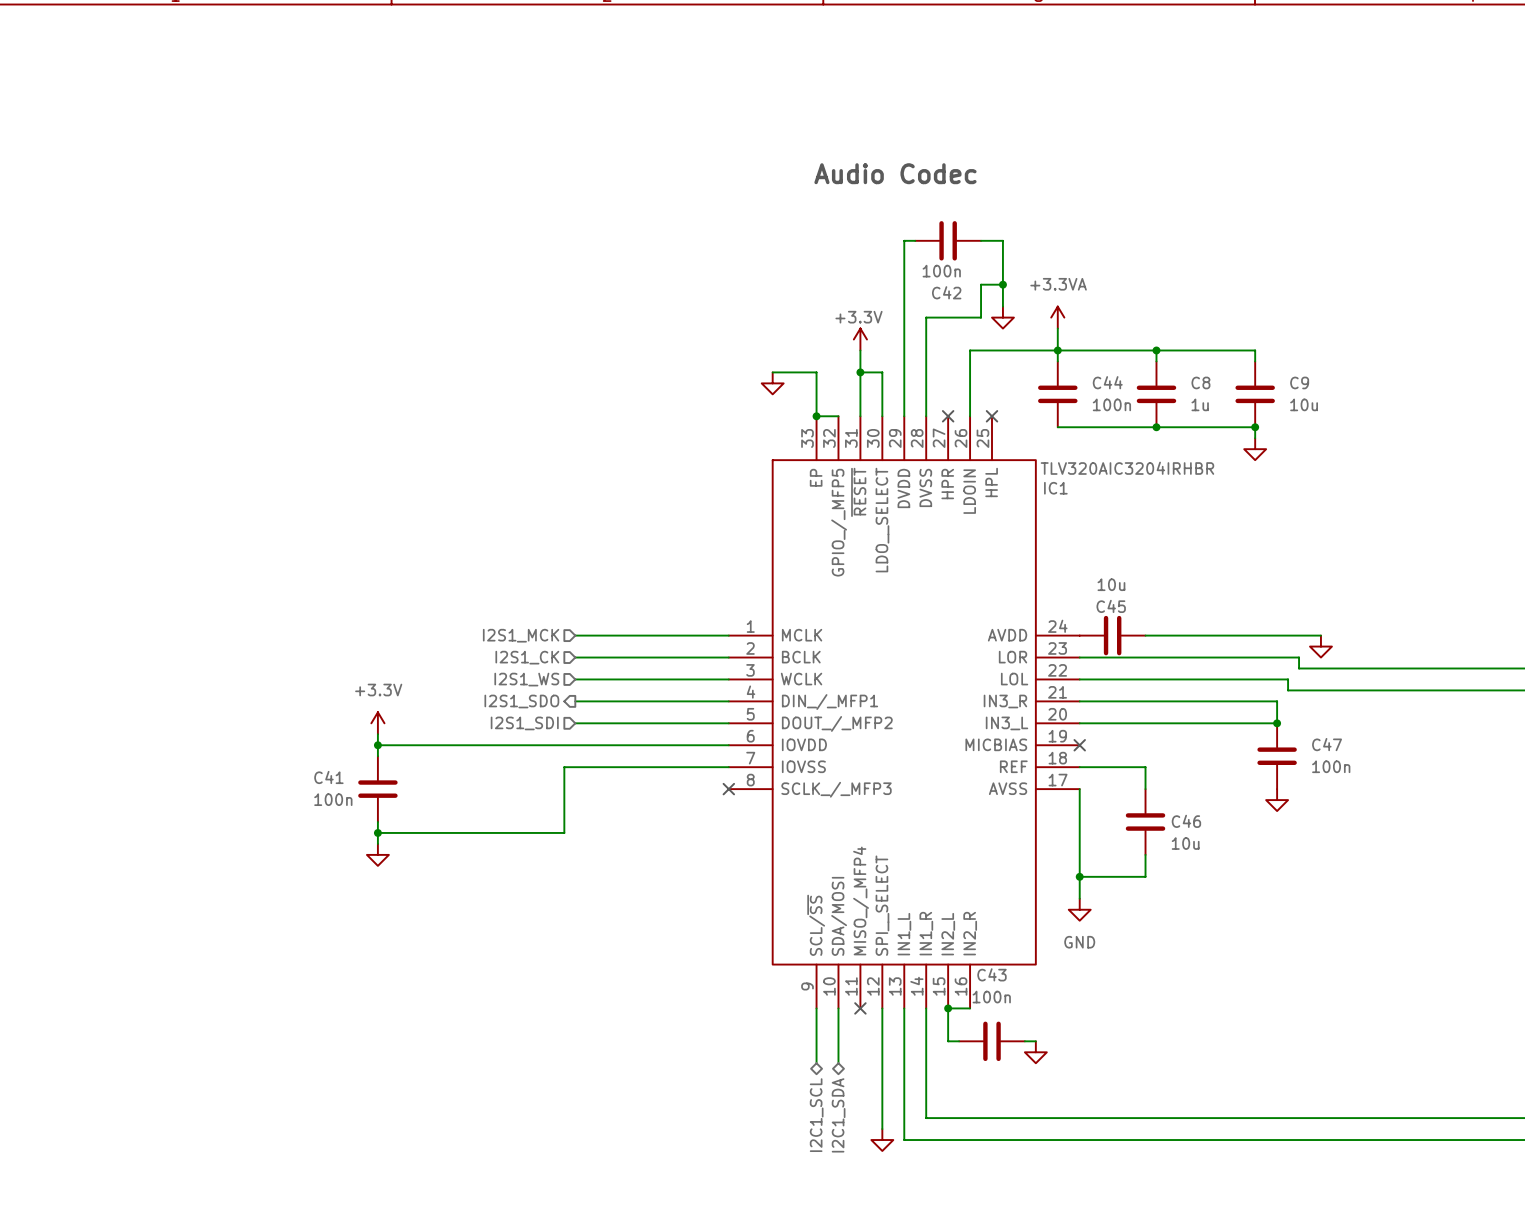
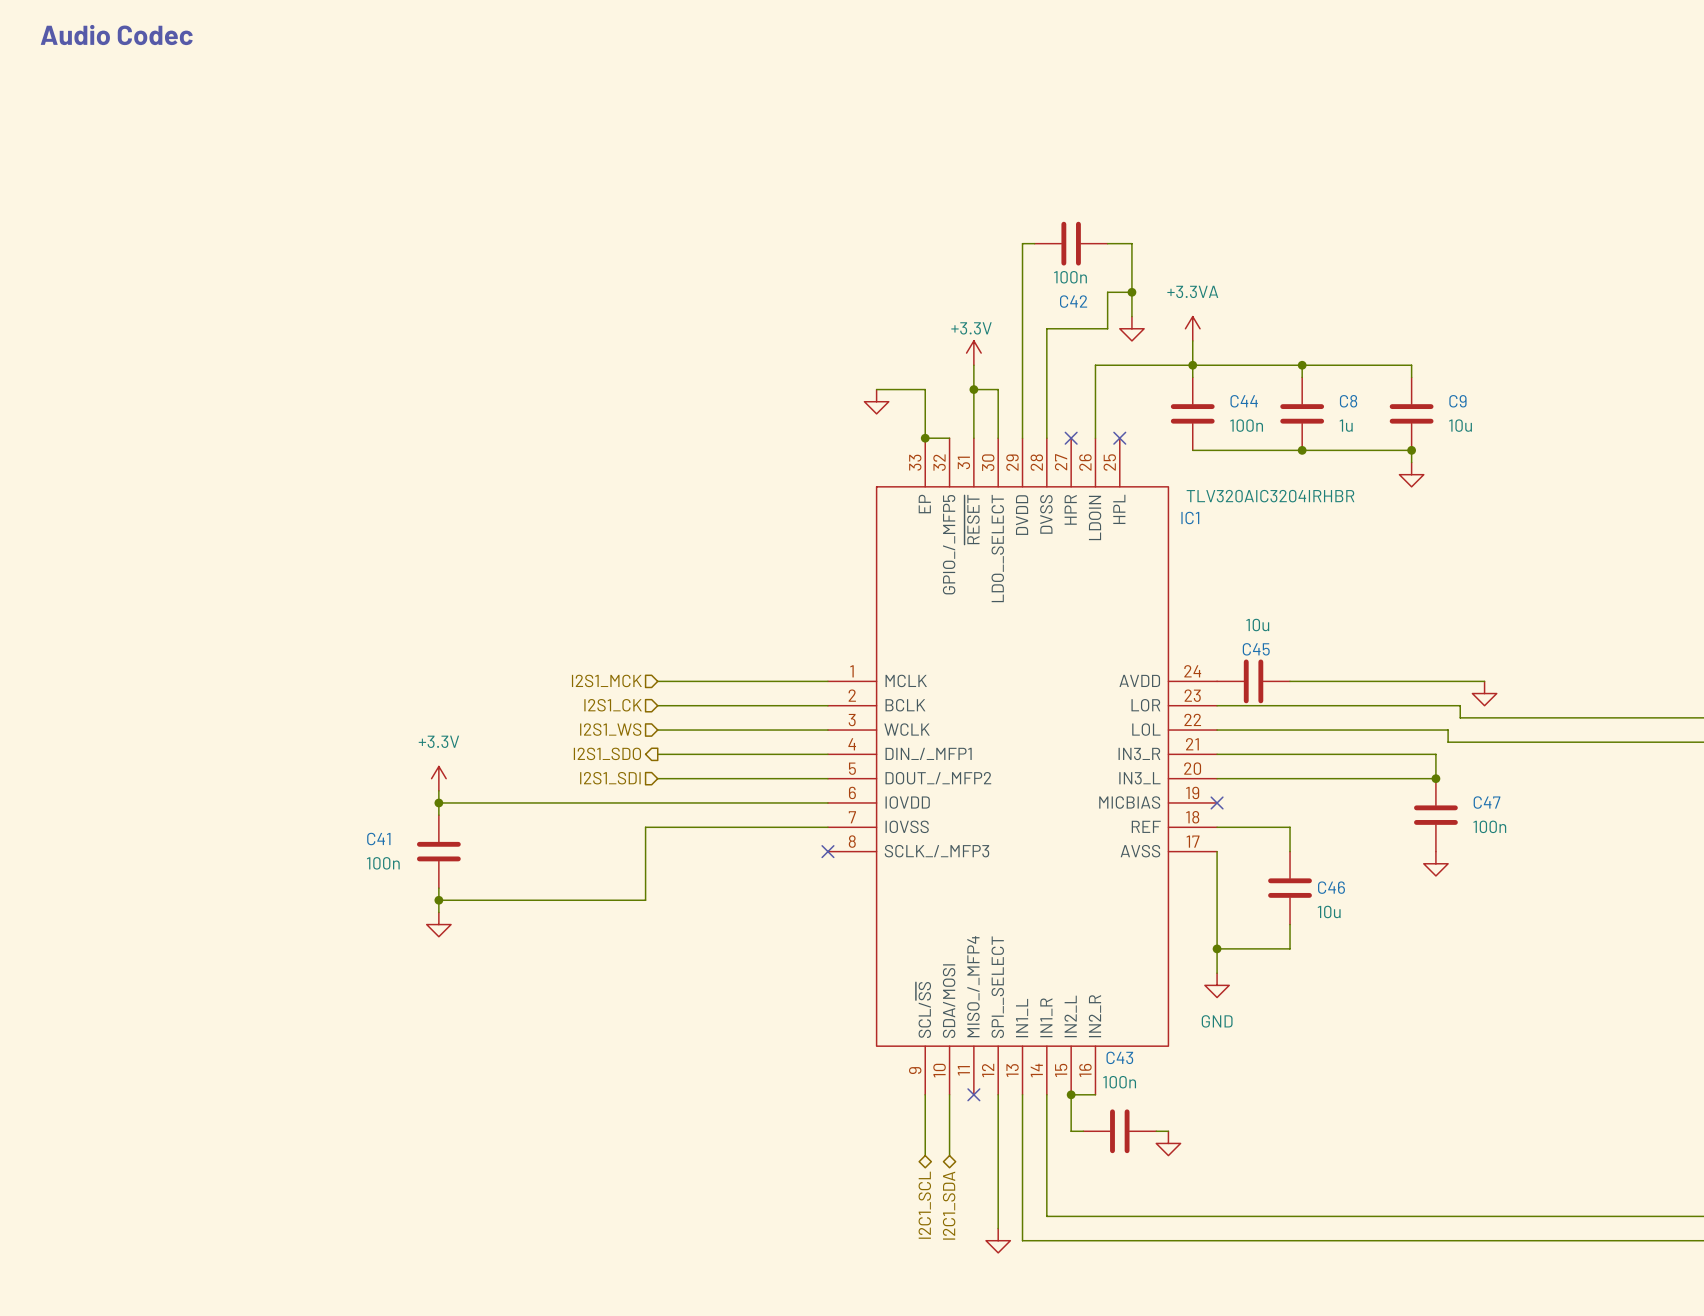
text: none -> Audio Codec (116, 35)
text: Audio Codec (895, 173) -> none

